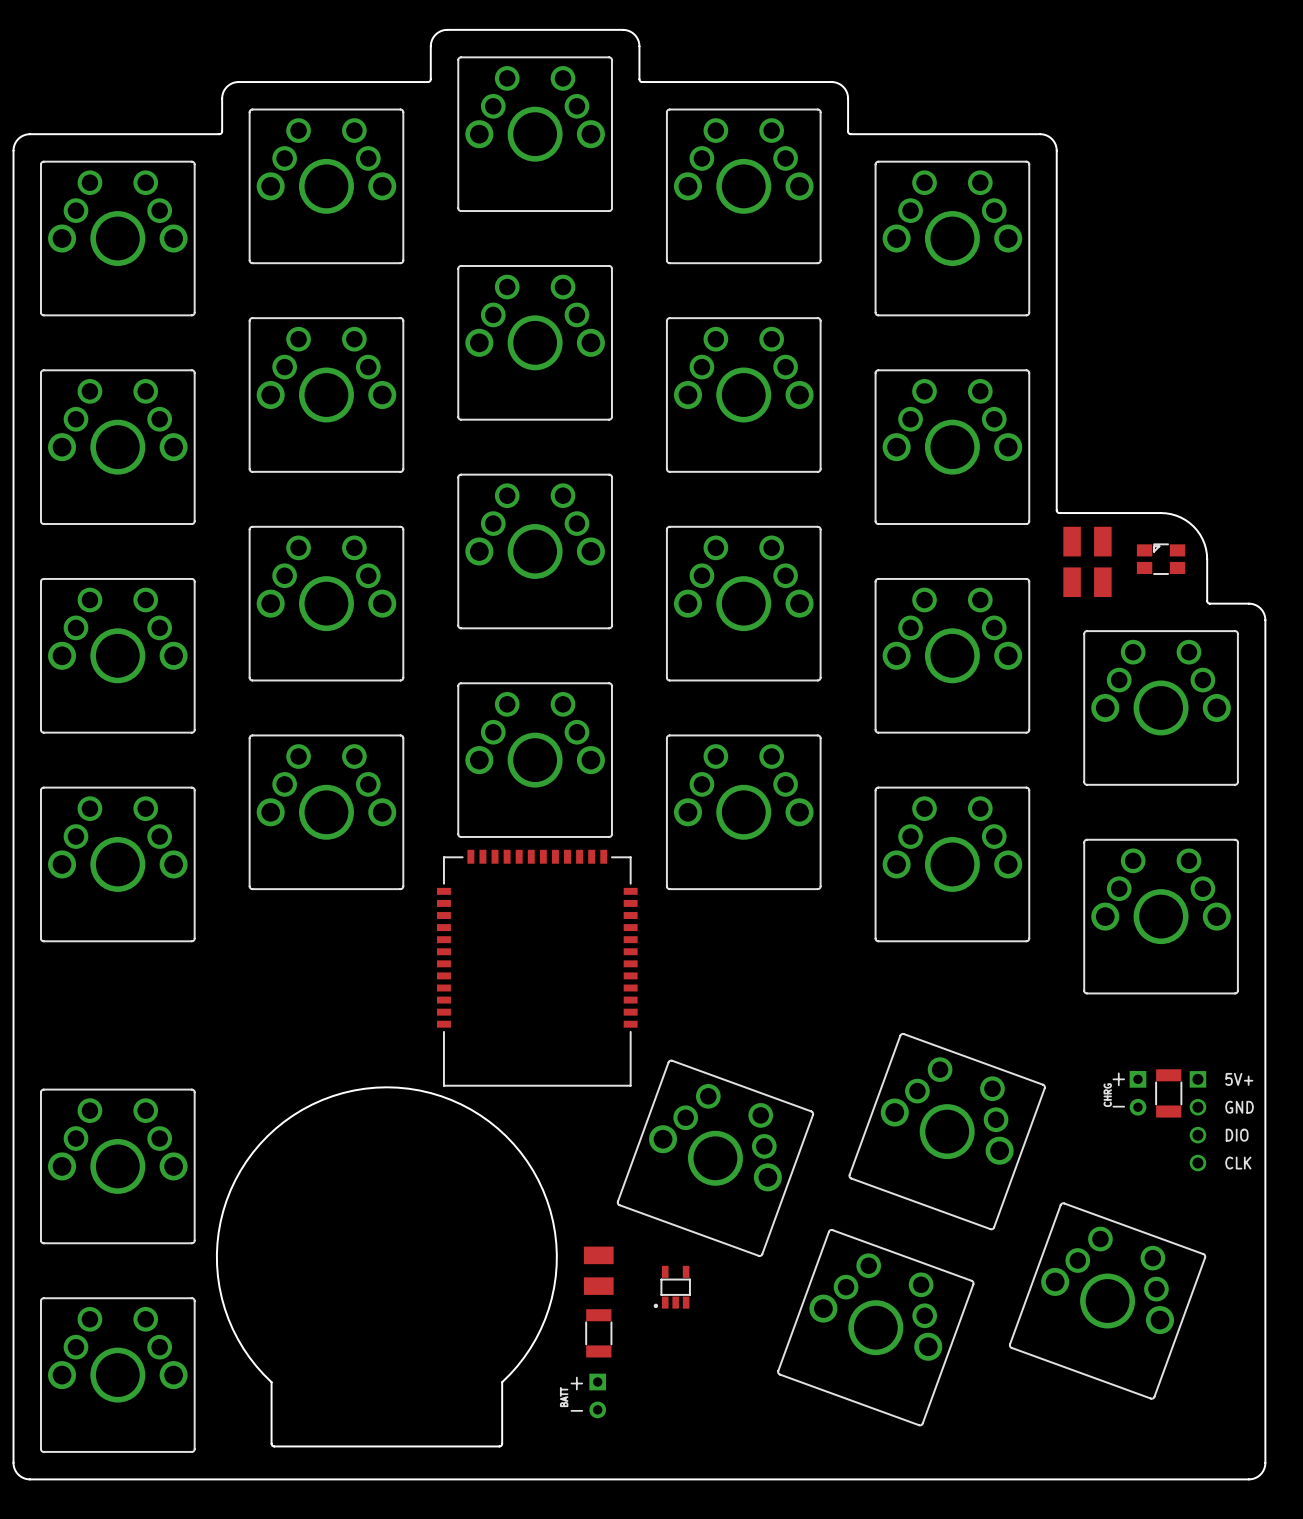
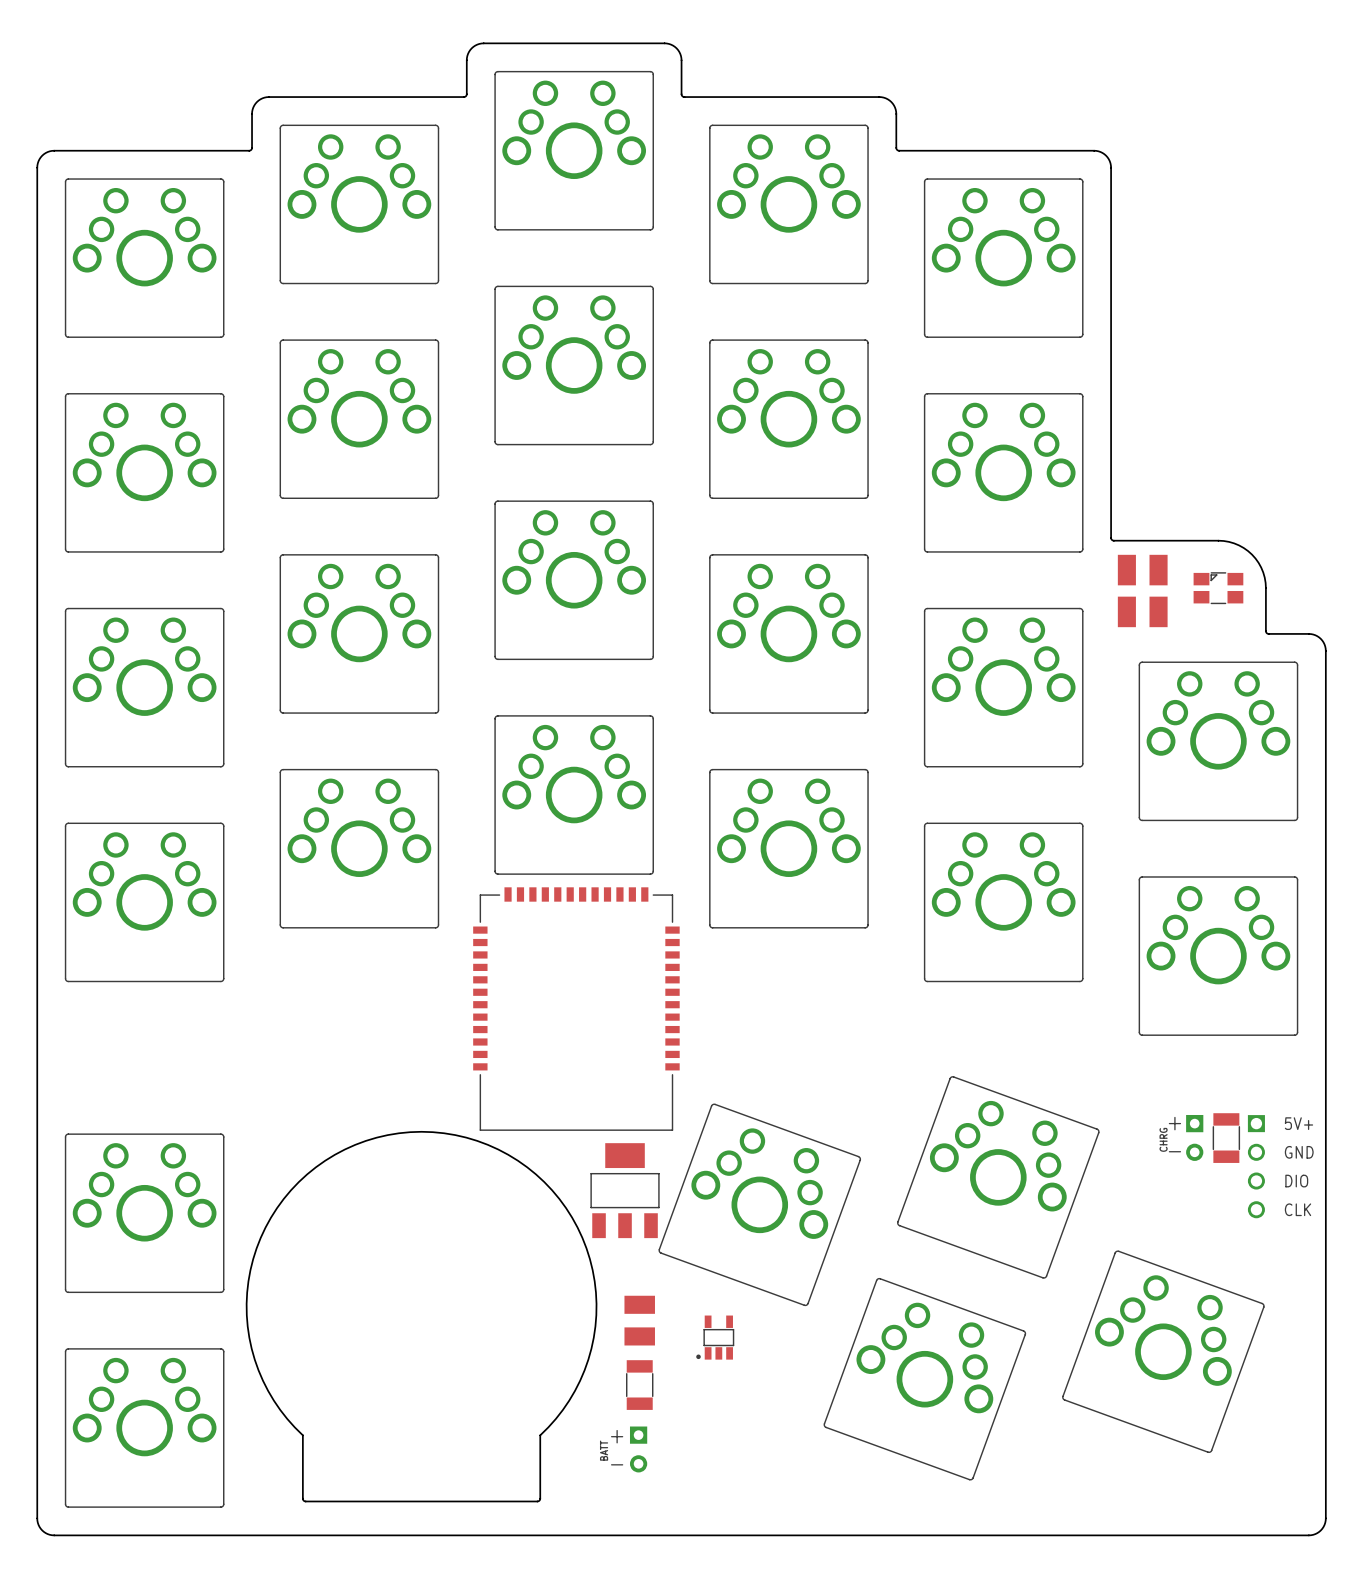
part: none -> (625, 1190)

